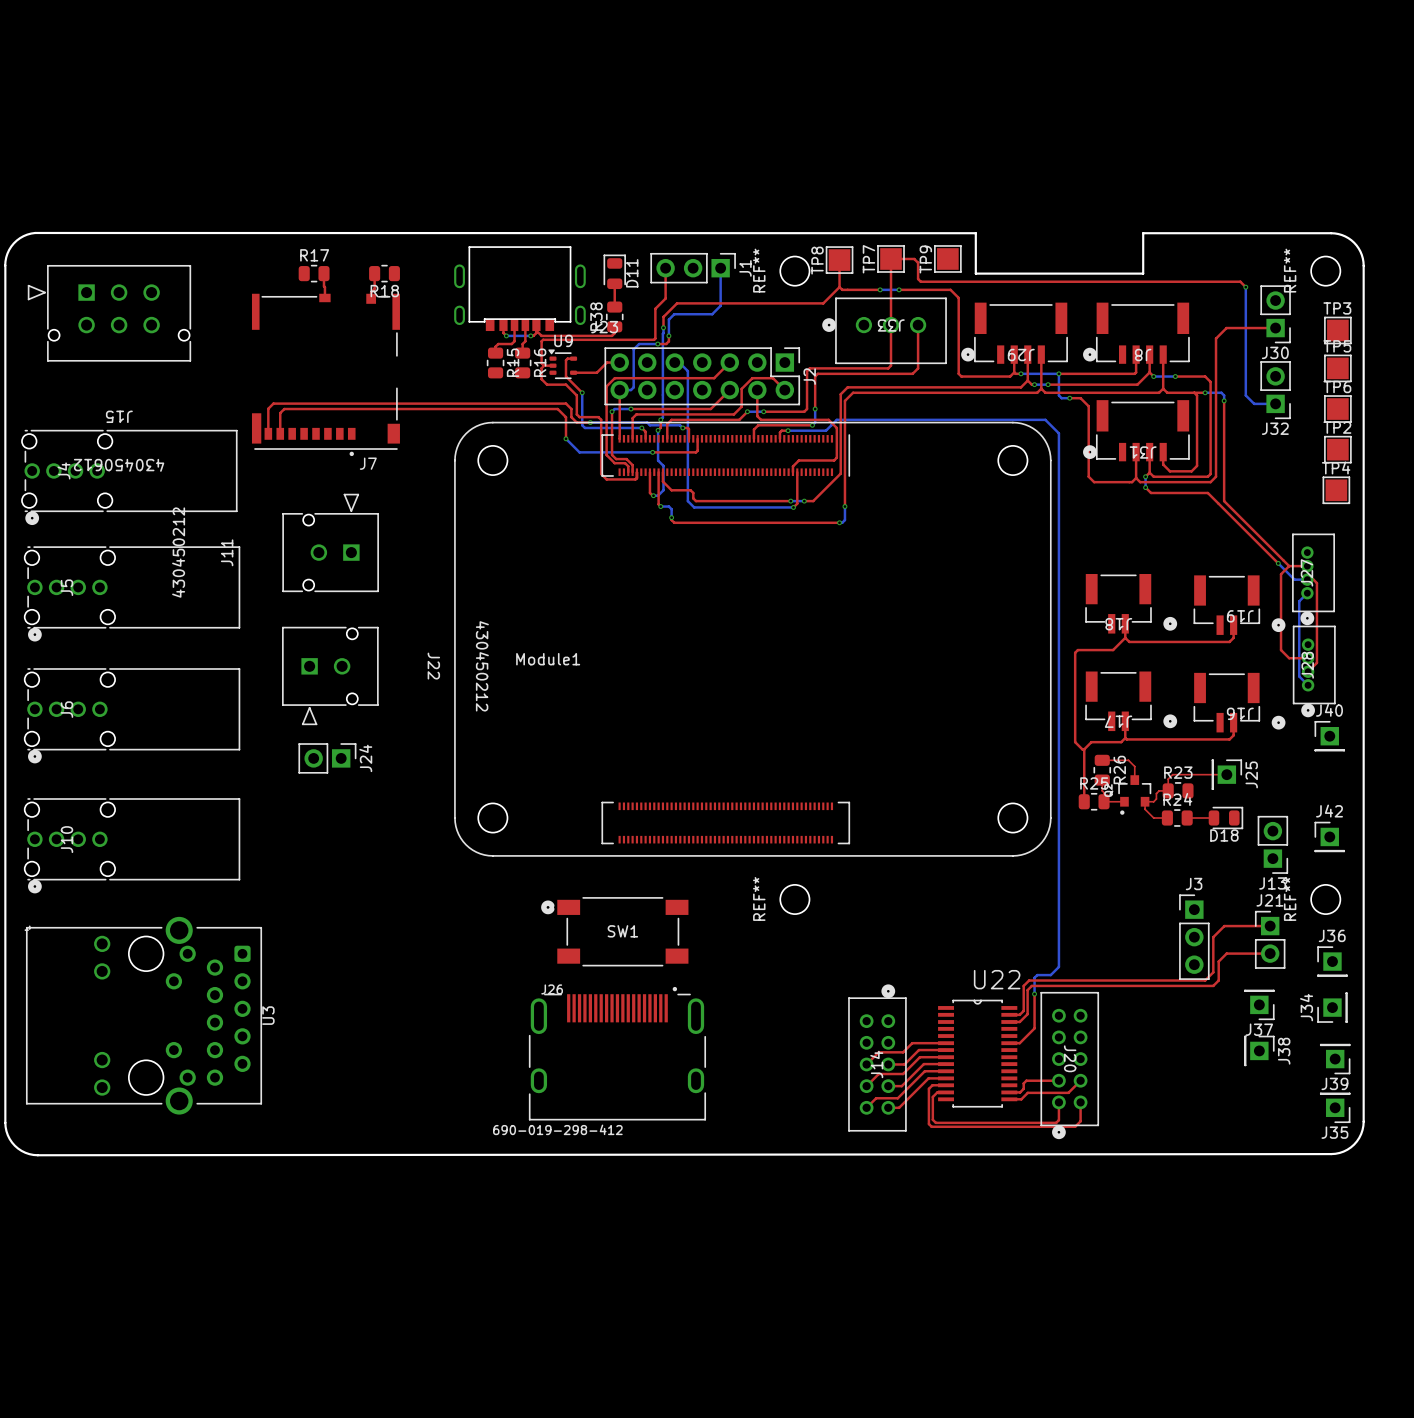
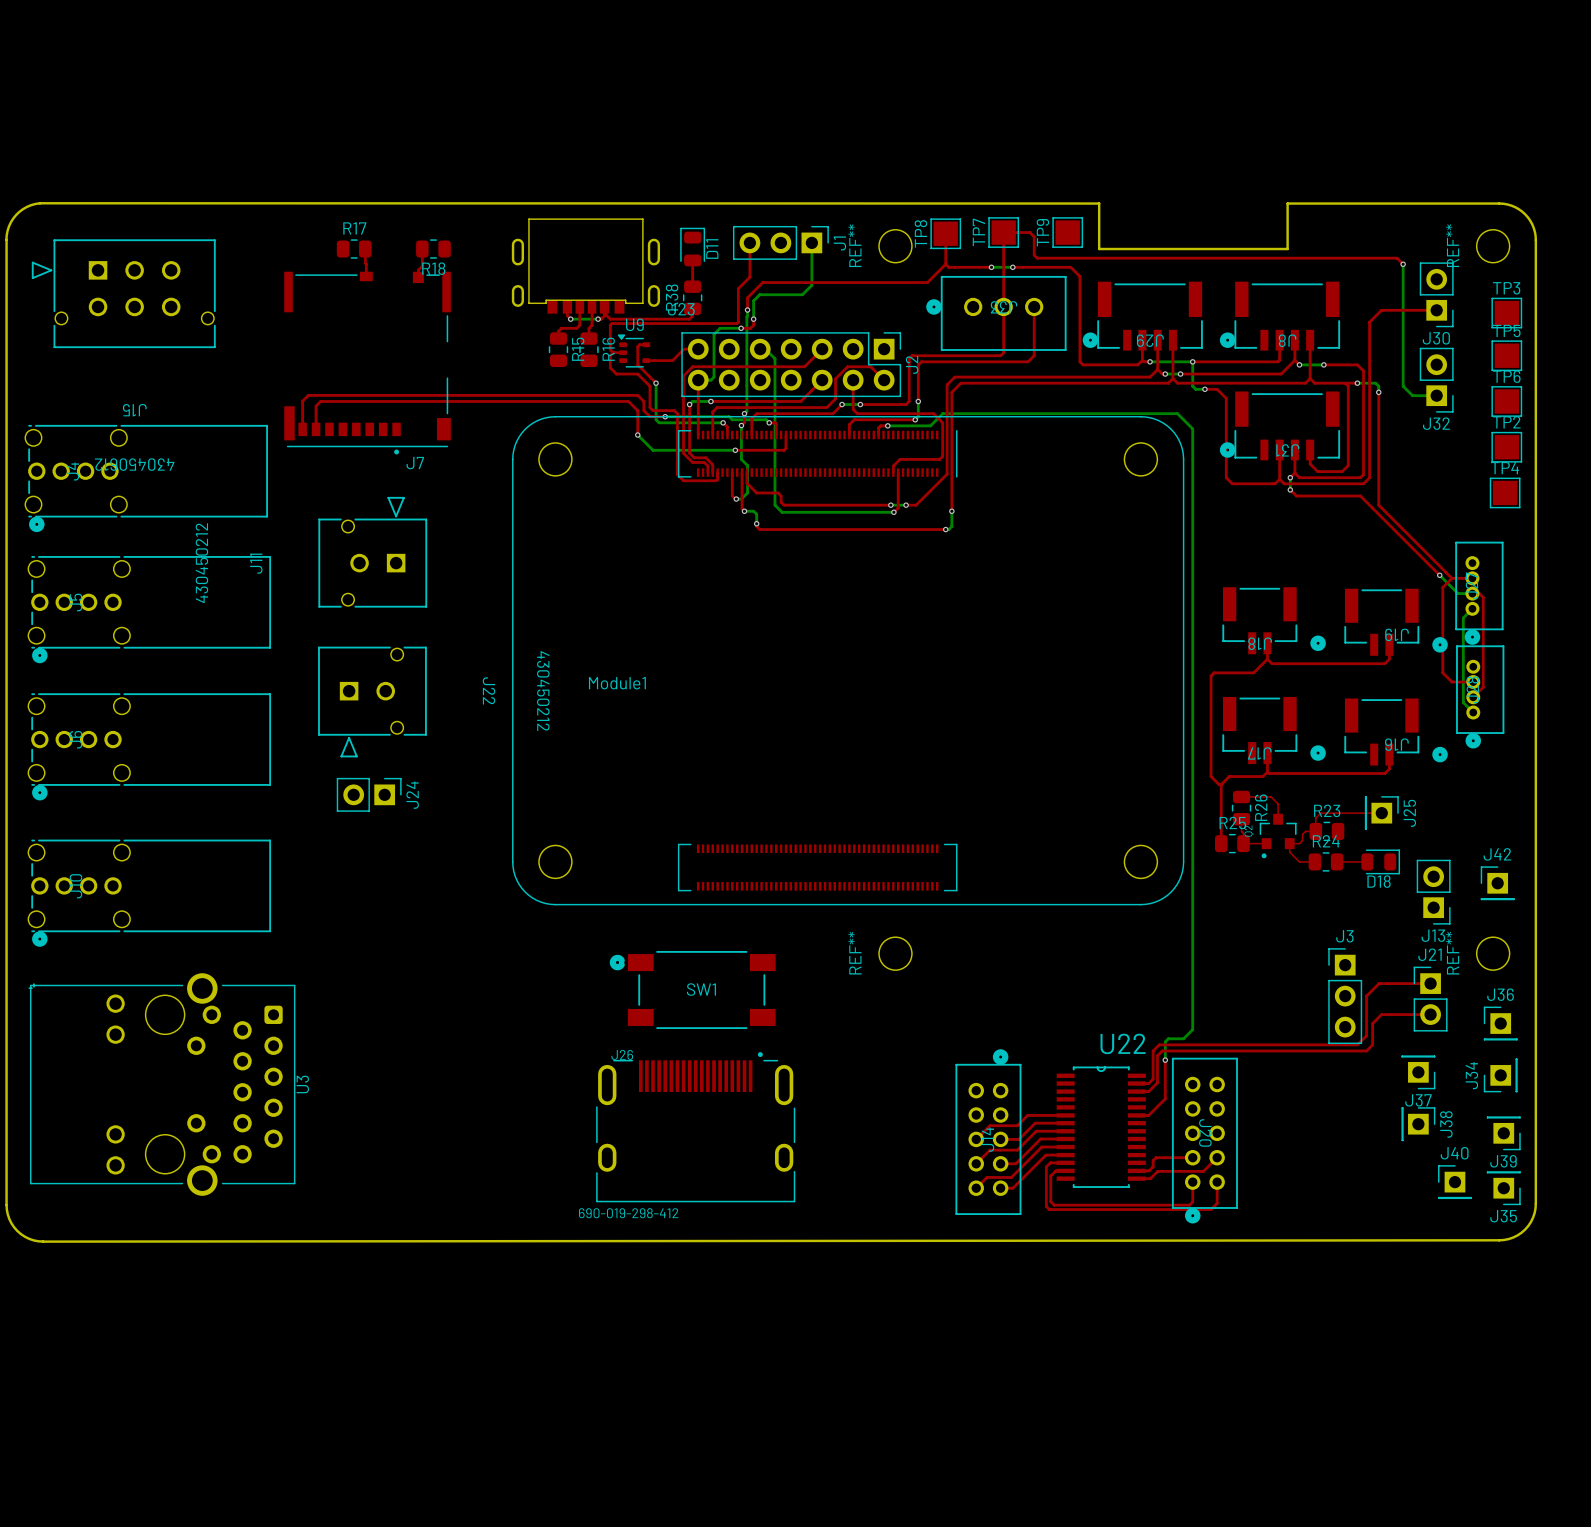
J40 position: (1329, 736) -> (1454, 1182)

